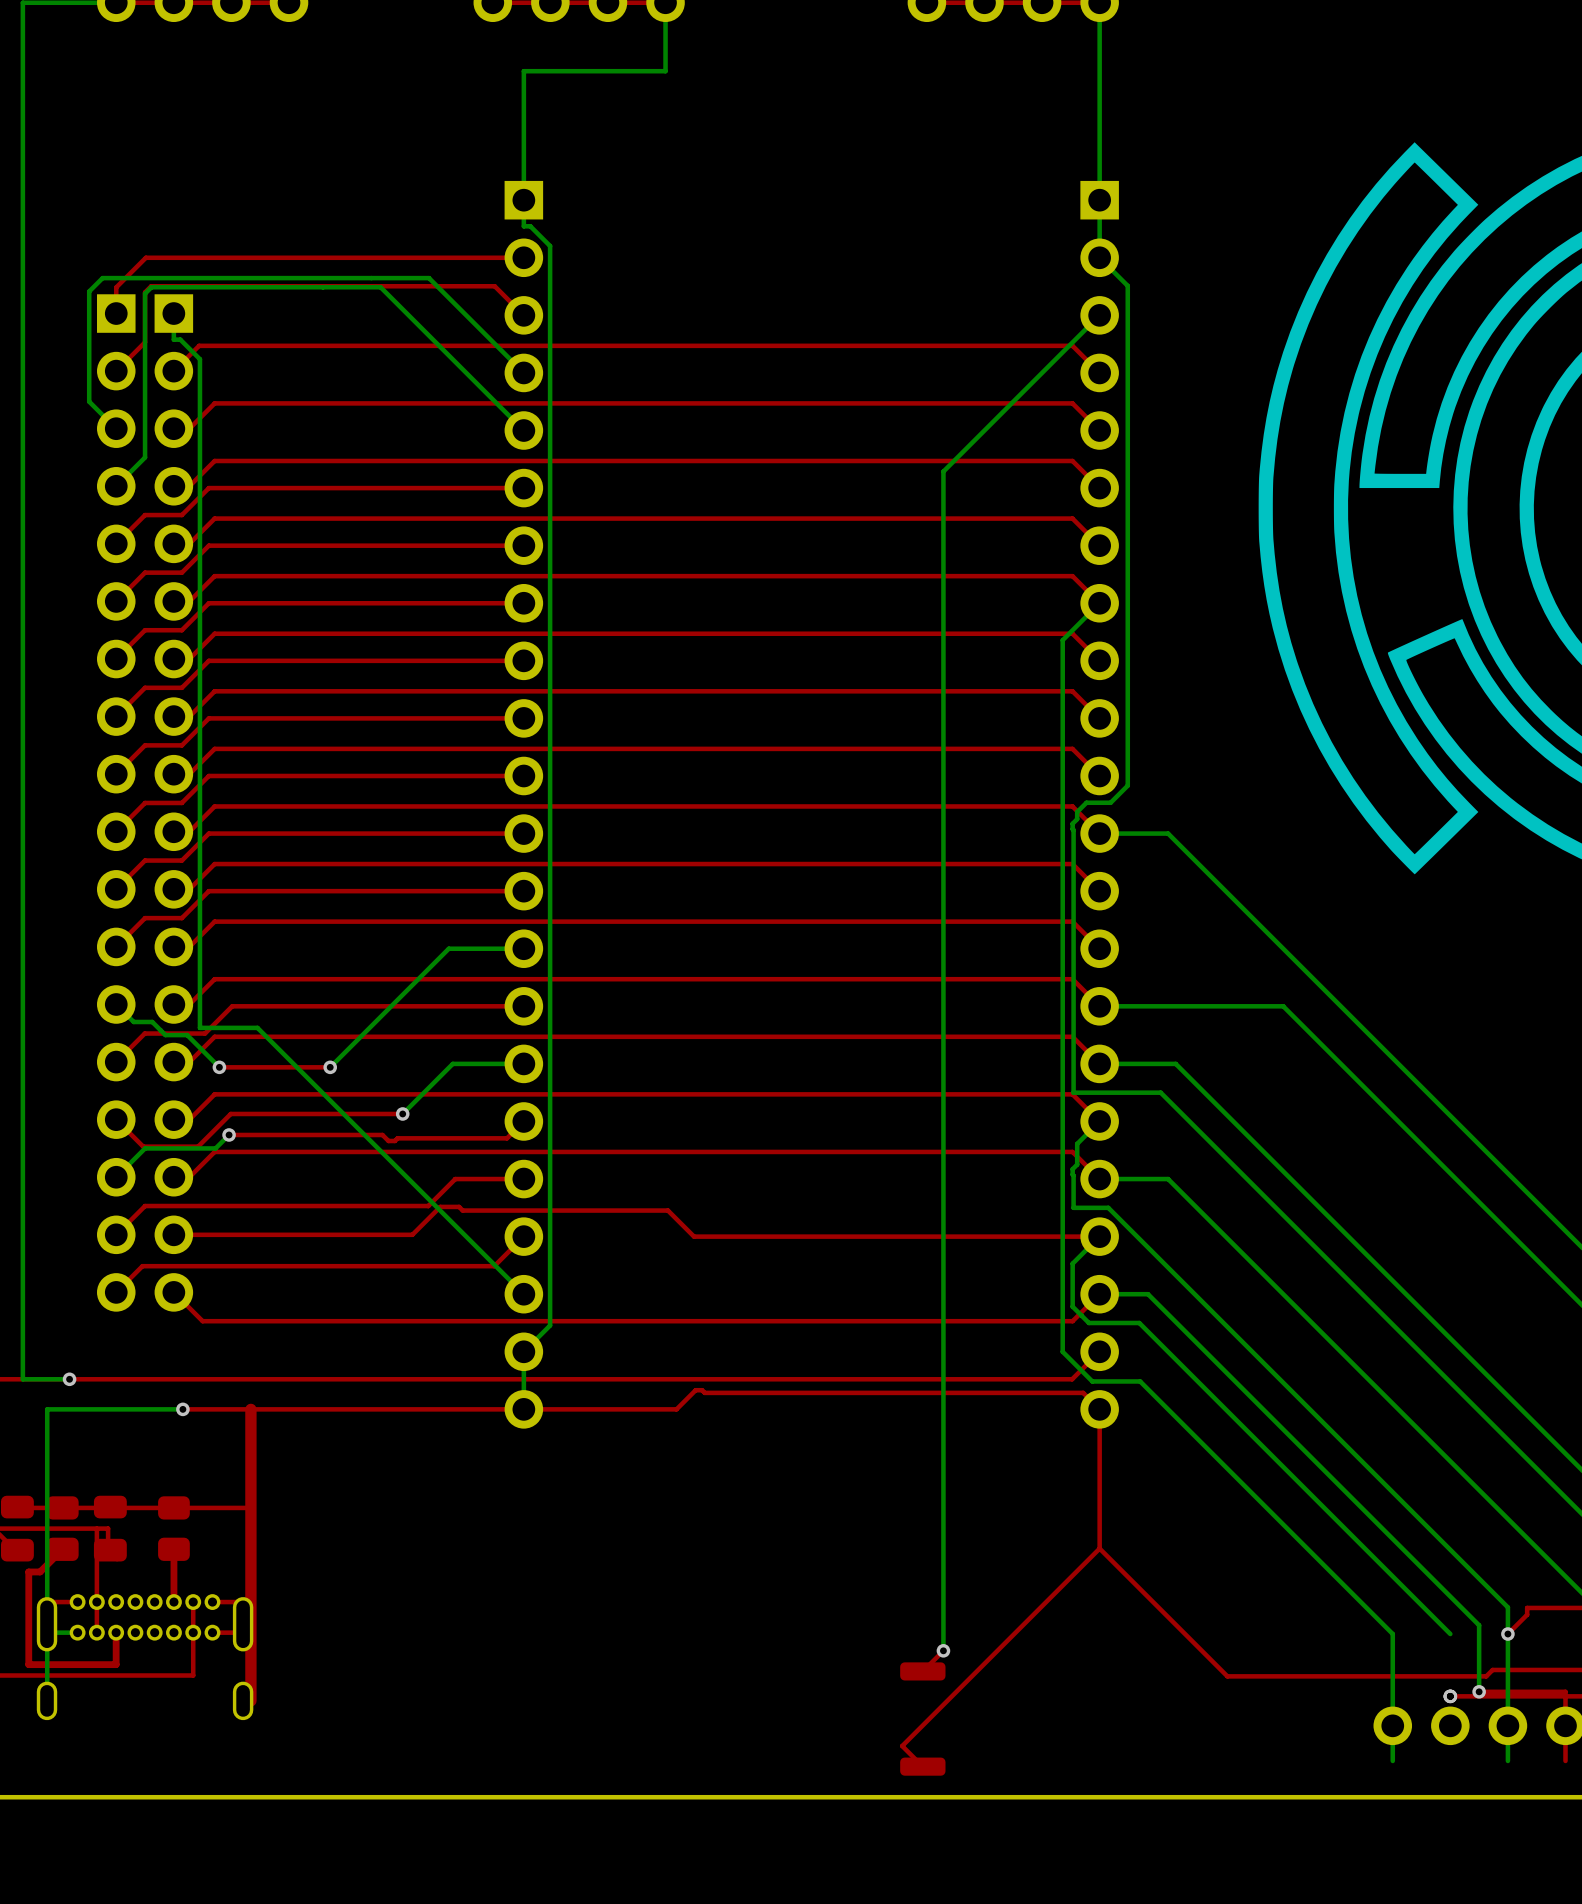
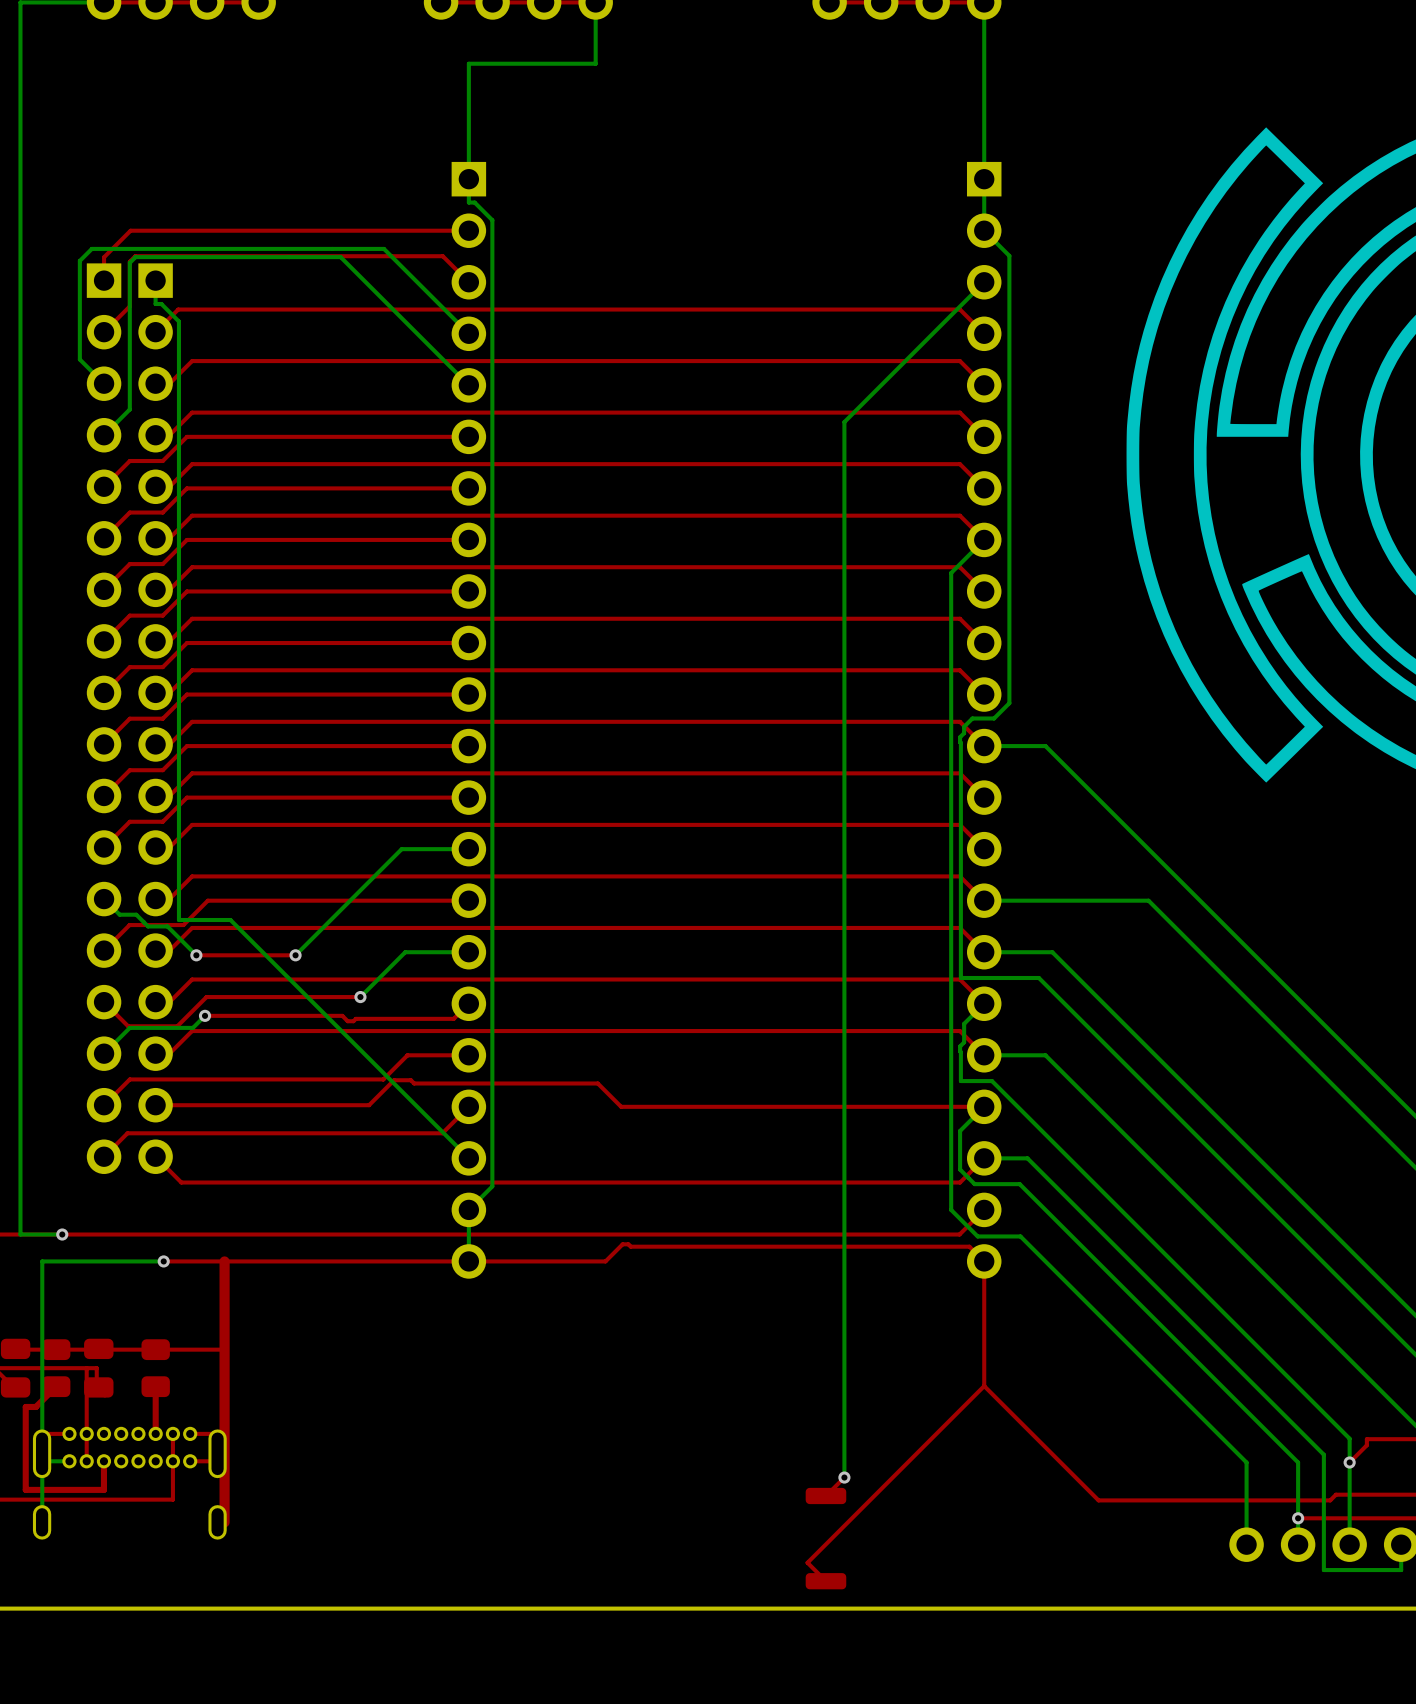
bottom track: none -> (1298, 1462) (1298, 1544)
top track: (1479, 1691) (1565, 1691) (1565, 1760) -> none
bottom track: none -> (1323, 1514) (1323, 1570) (1401, 1570) (1401, 1544)
via: (1479, 1691) -> none
bottom track: (1392, 1725) (1392, 1760) -> none
bottom track: (1507, 1725) (1507, 1760) -> none

